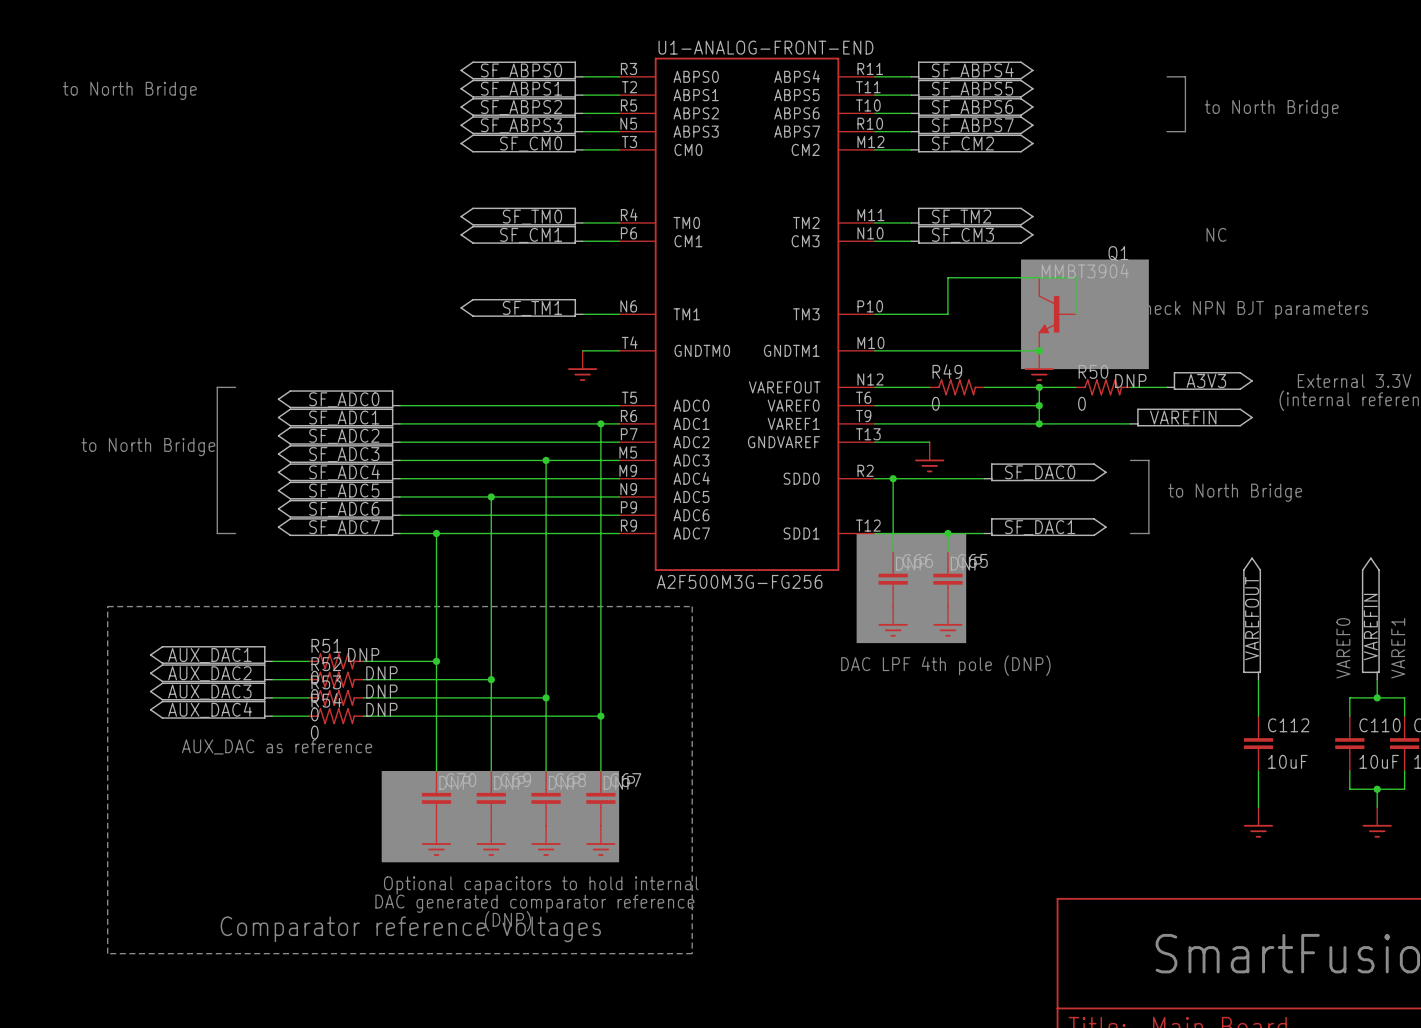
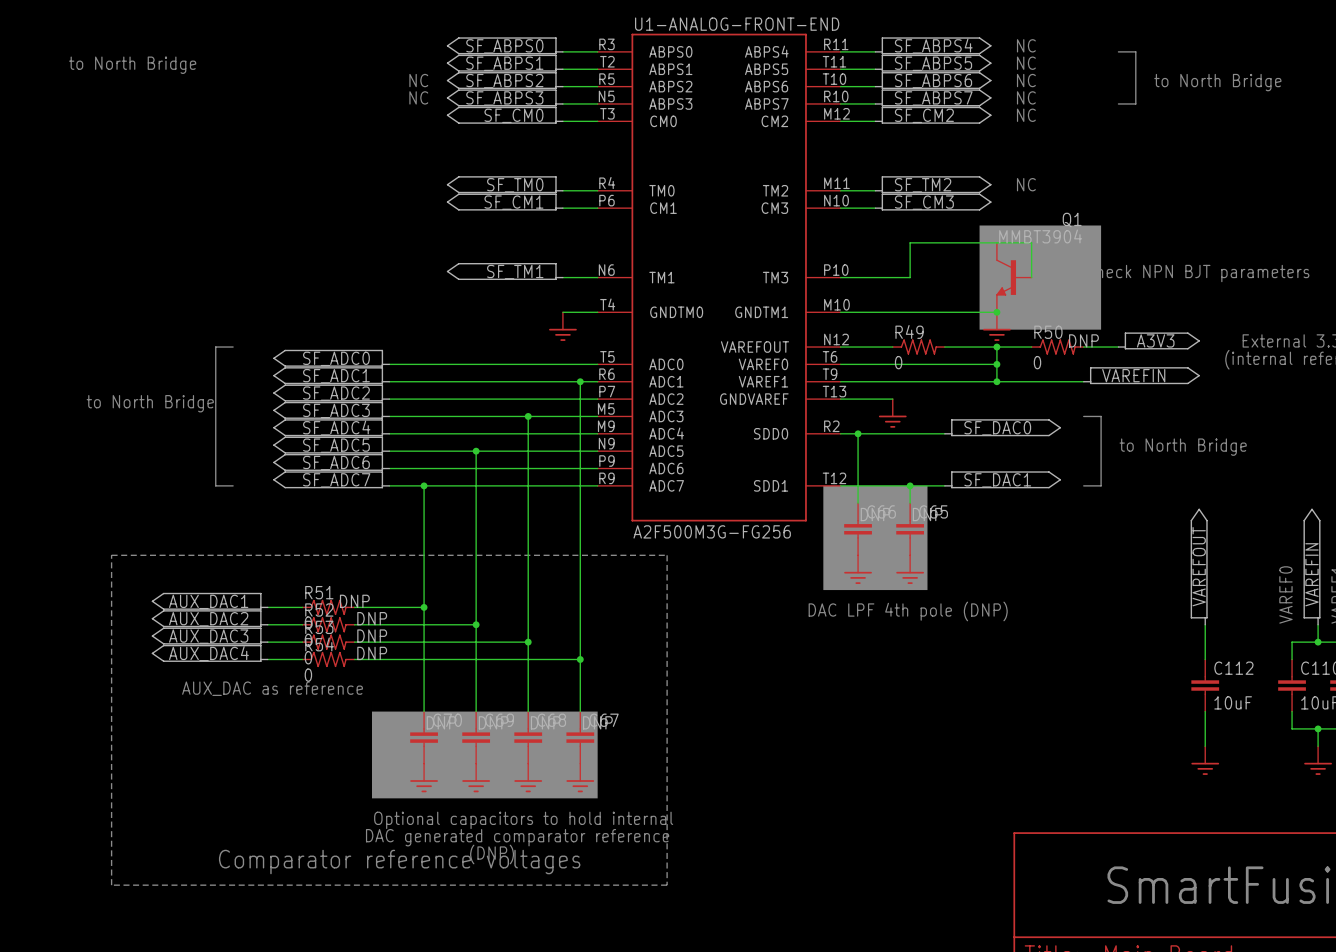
text: none -> NC (1026, 45)
text: none -> NC (1026, 63)
text: none -> NC (418, 80)
text: none -> NC (1026, 80)
text: none -> NC (418, 97)
text: none -> NC (1026, 97)
text: none -> NC (1026, 115)
text: none -> NC (1026, 184)
text: NC (1216, 234) -> none

